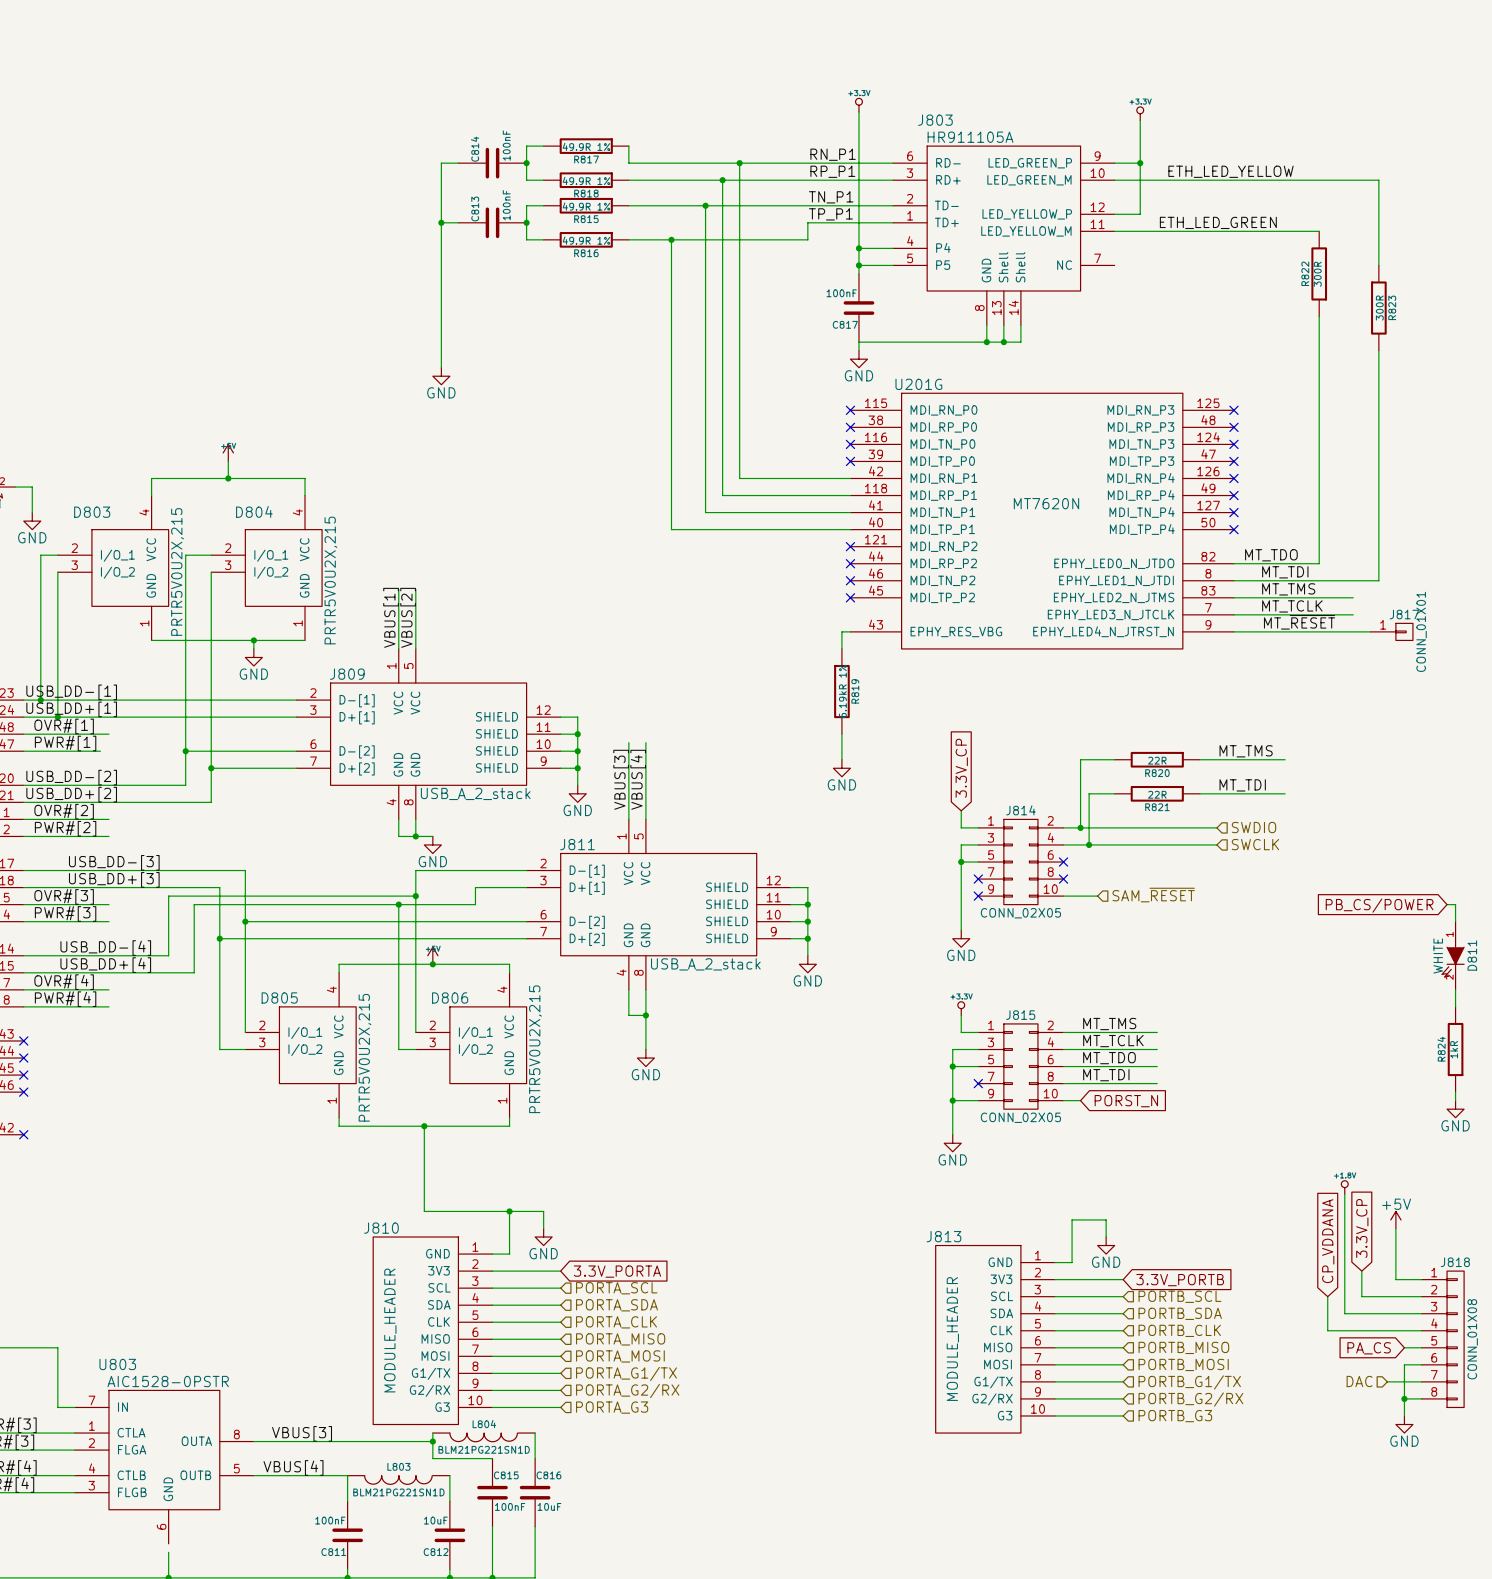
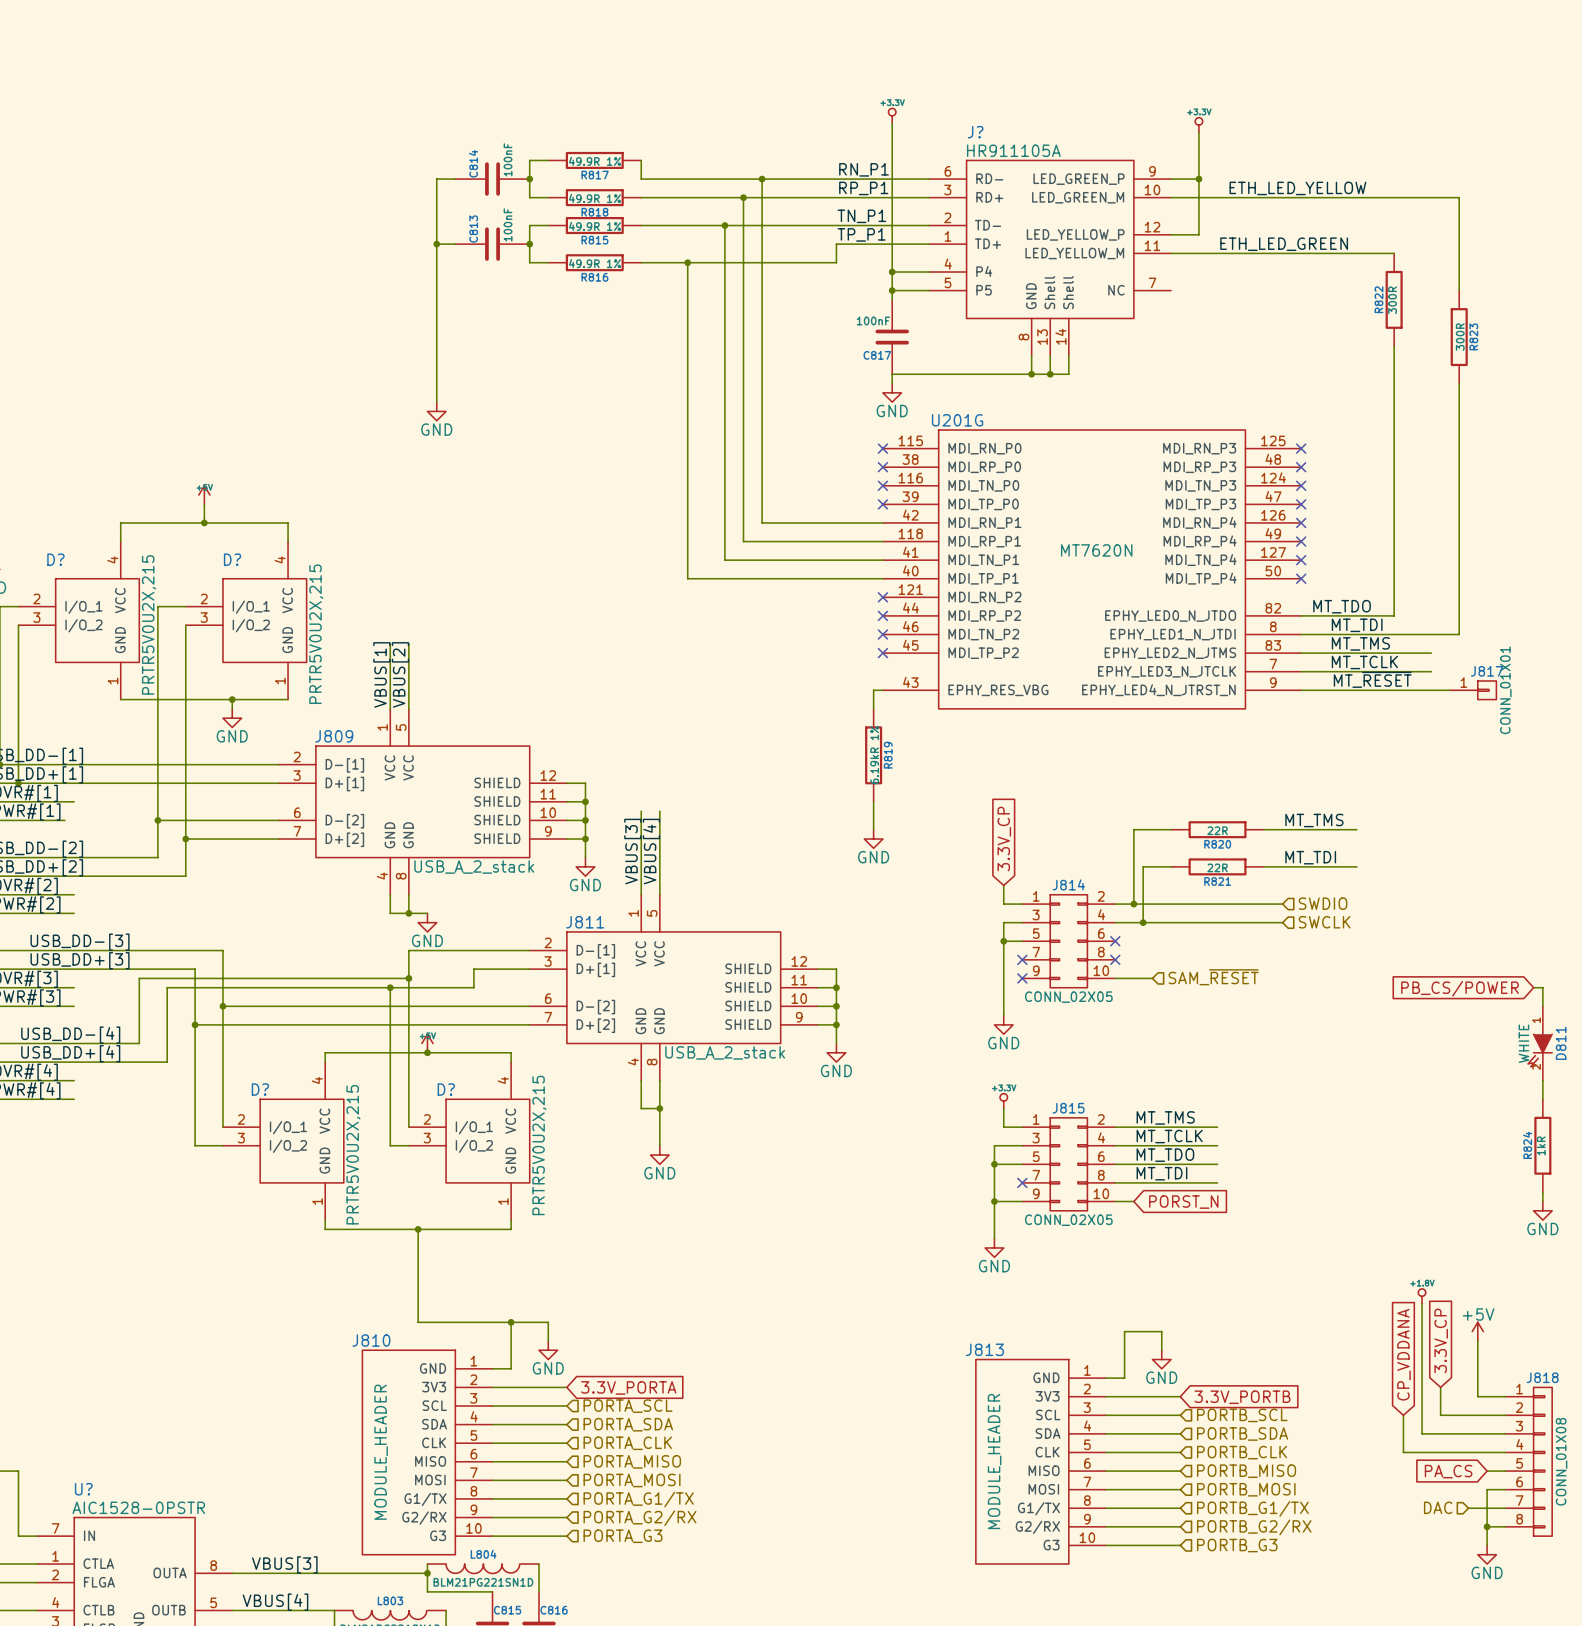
J803 name: J803 (935, 120) -> J? (975, 132)
D804 name: D804 (254, 511) -> D? (232, 559)
D803 name: D803 (92, 512) -> D? (55, 559)
D805 name: D805 (279, 997) -> D? (260, 1089)
D806 name: D806 (450, 997) -> D? (446, 1089)
U803 name: U803 (117, 1364) -> U? (83, 1489)

